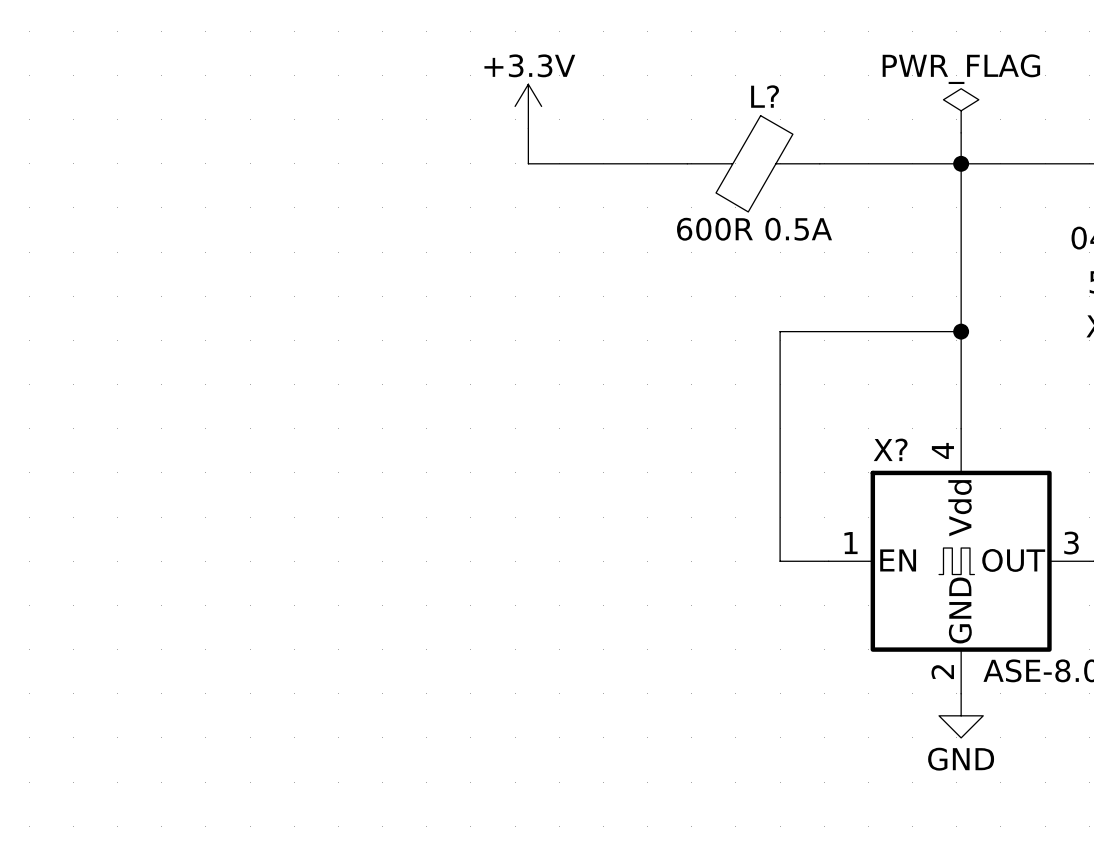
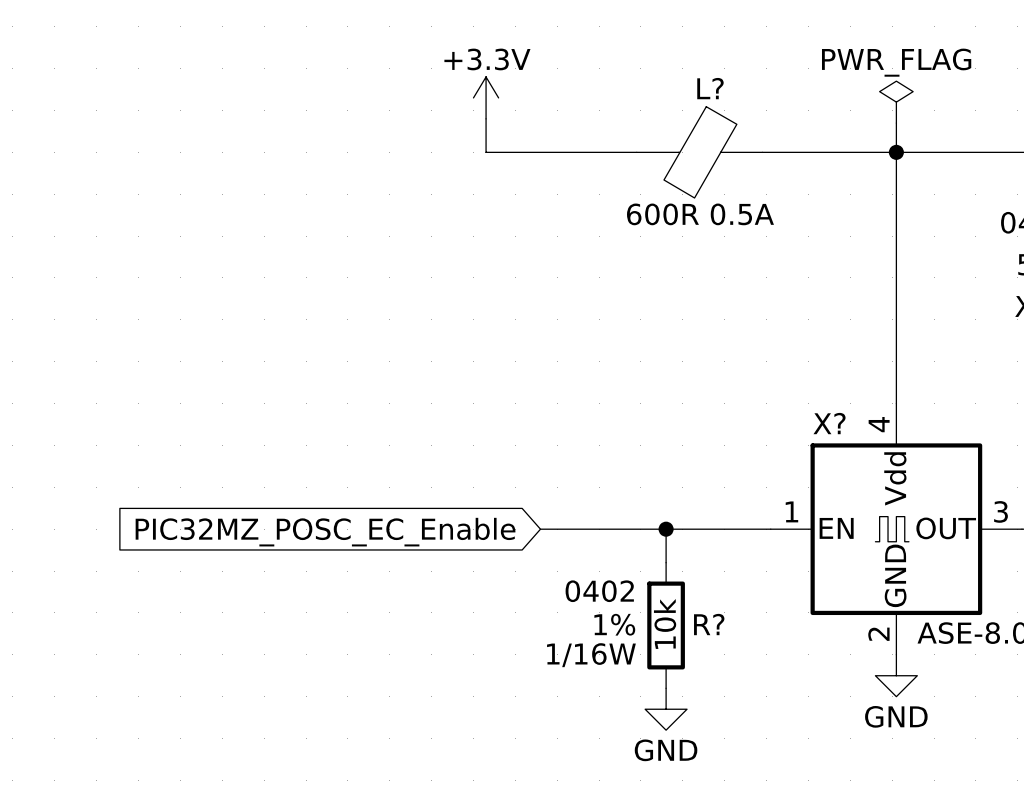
wire: (961, 331) (780, 331) (780, 561) -> (540, 529) (724, 529)
junction: (961, 331) -> none
wire: none -> (666, 529) (666, 562)
junction: none -> (666, 529)
global label: none -> PIC32MZ_POSC_EC_Enable (325, 532)
R?: none -> 10k (666, 625)
power symbol: none -> GND (666, 709)

